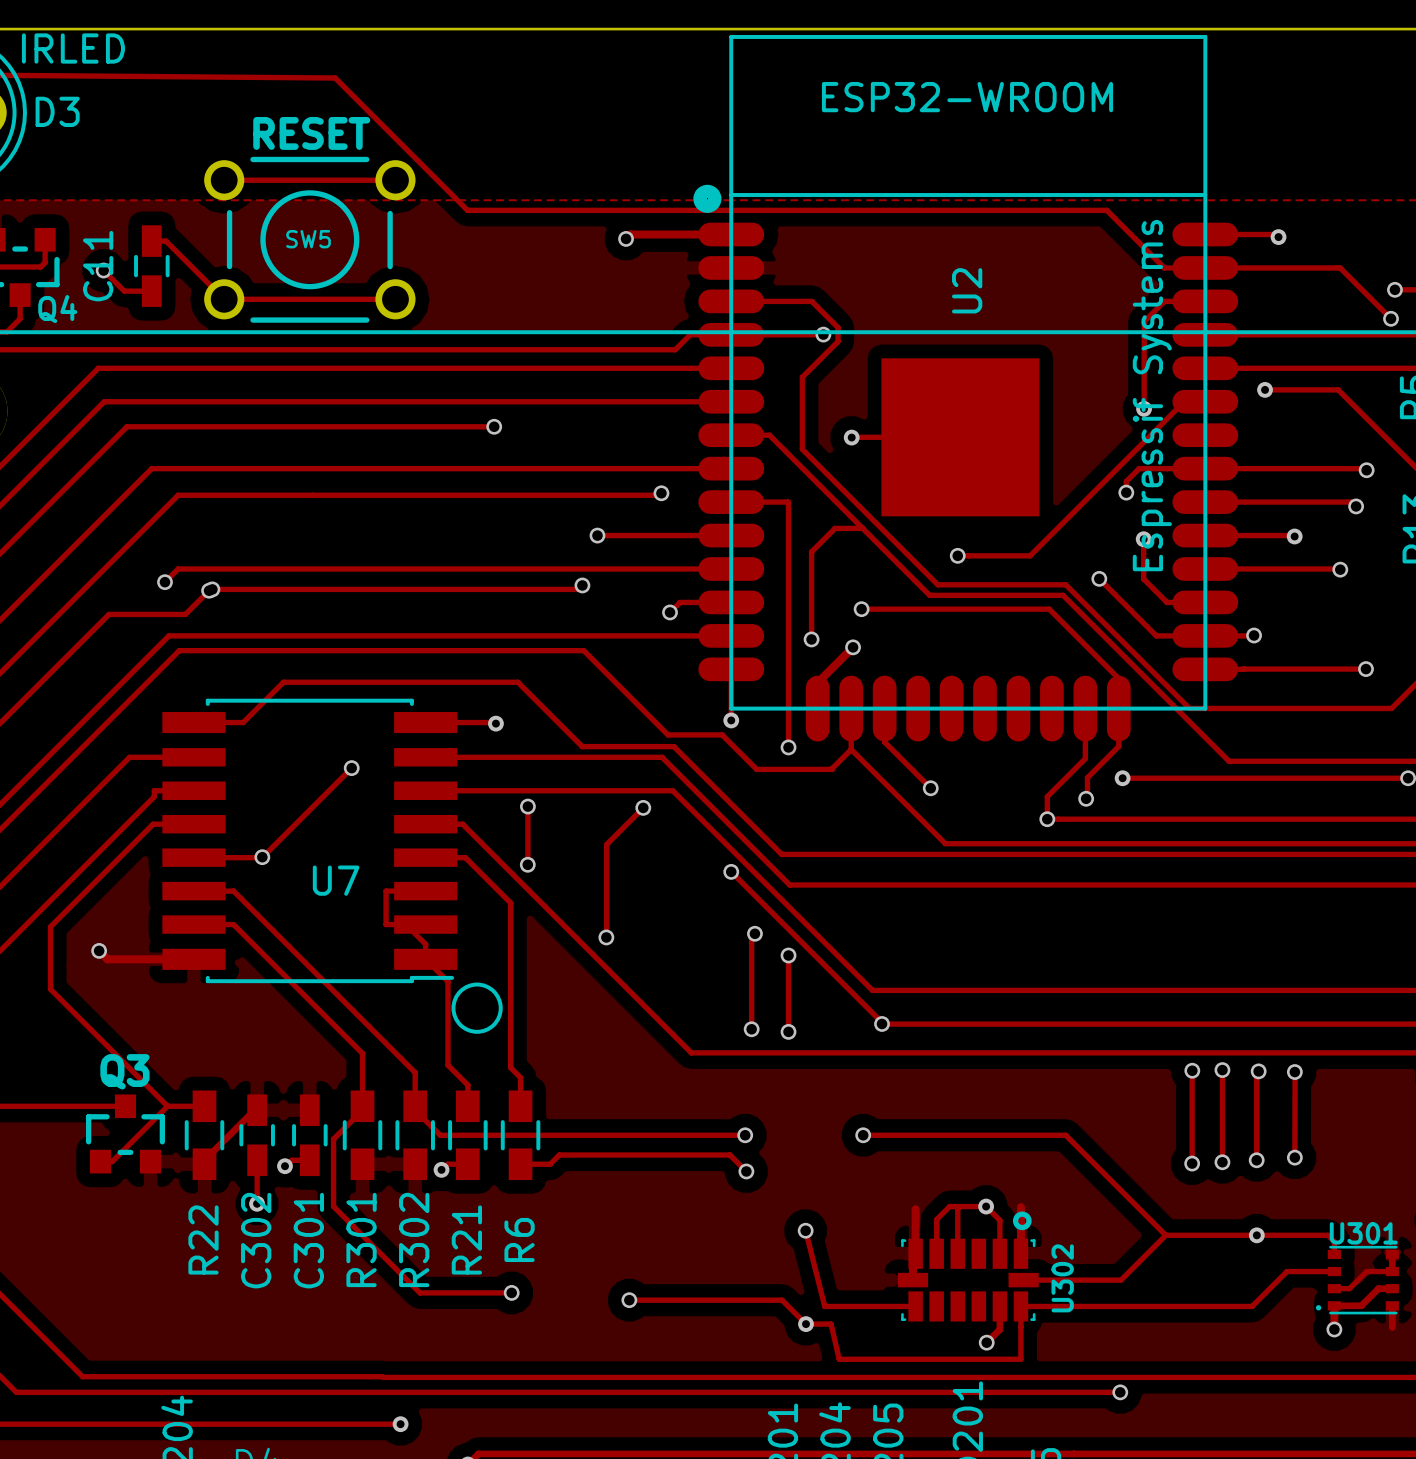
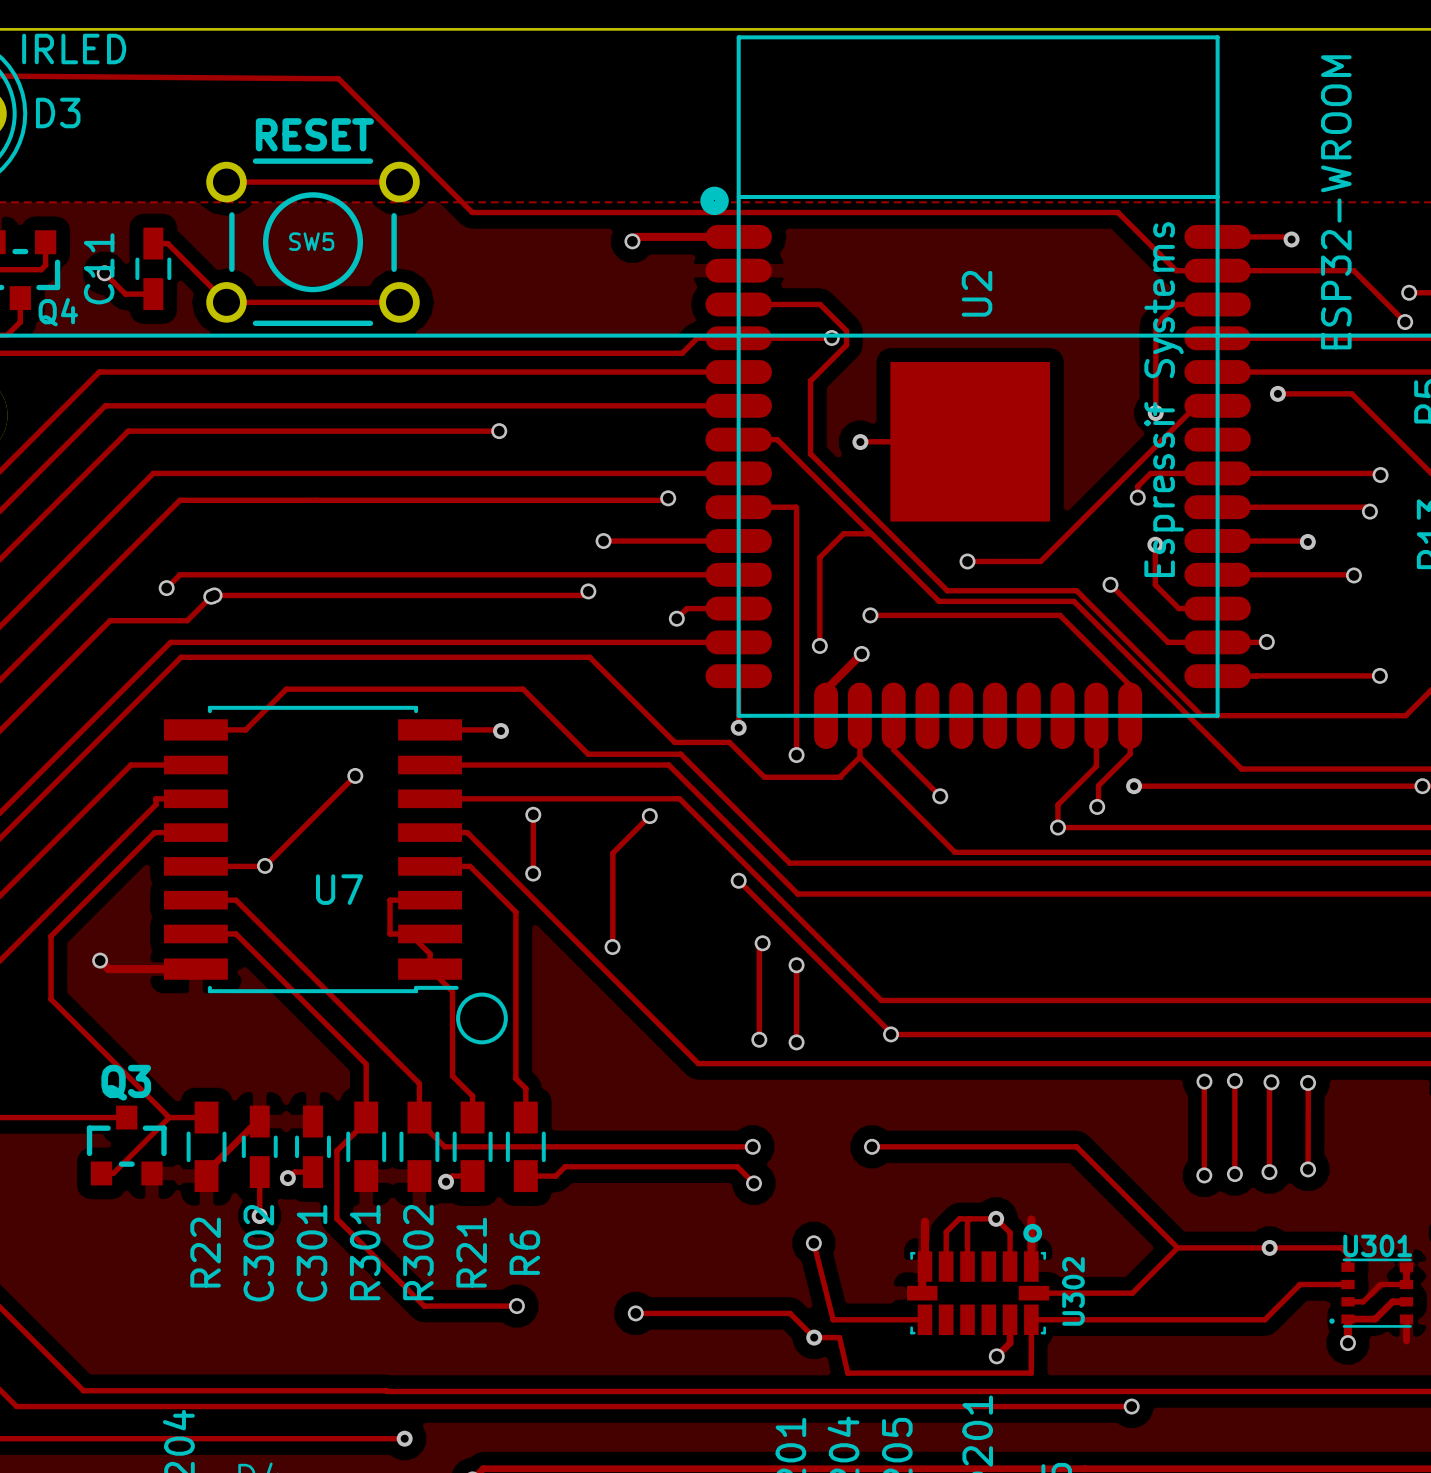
U2 text rotation: 0° (967, 97) -> 90° counterclockwise (1336, 202)
U2 text position: ESP32-WROOM (967, 97) -> ESP32-WROOM (1336, 202)

